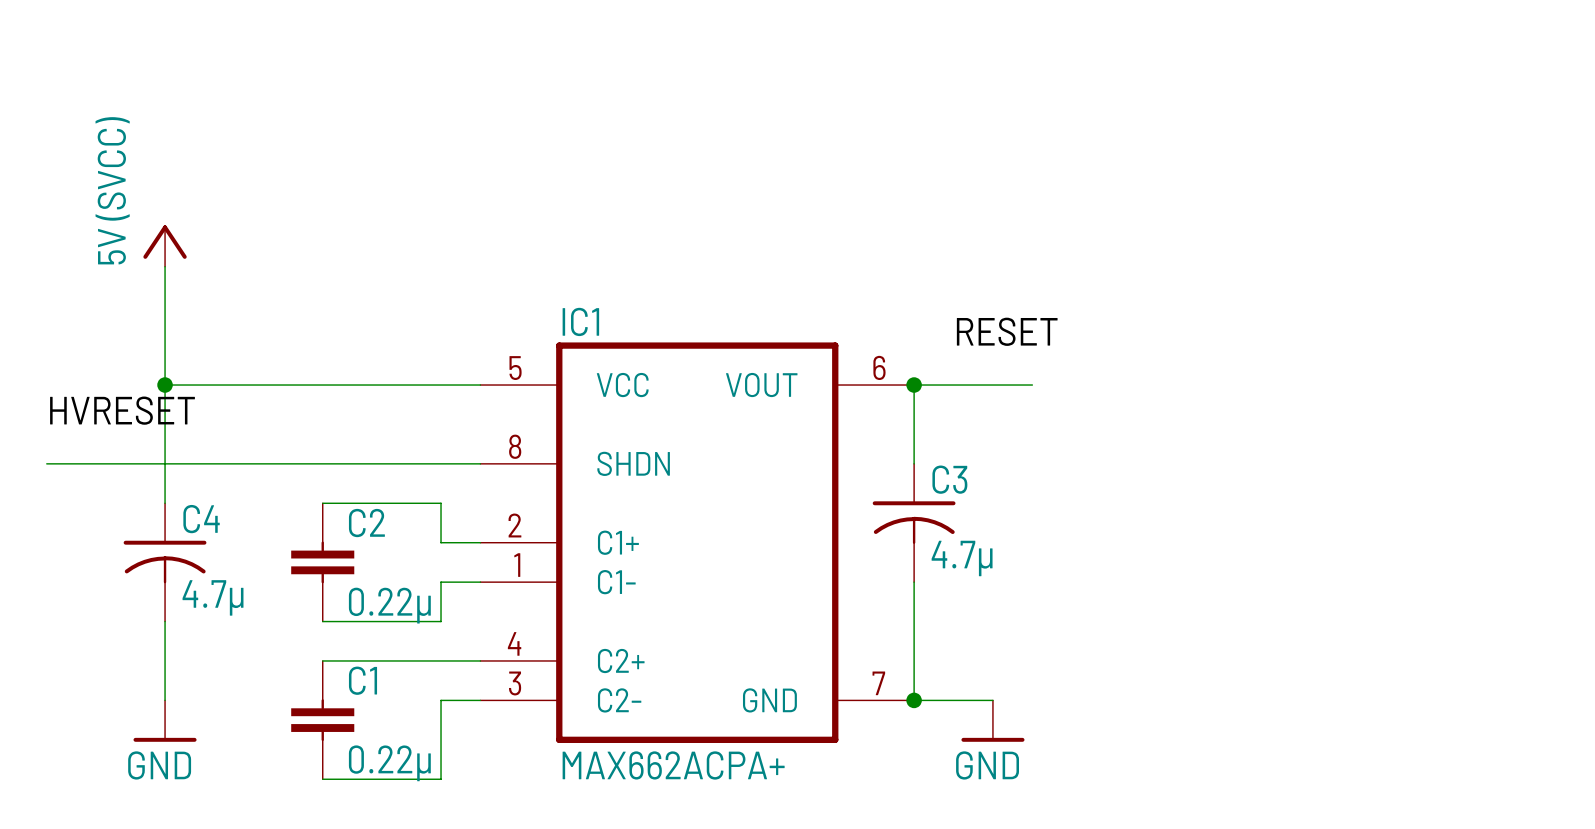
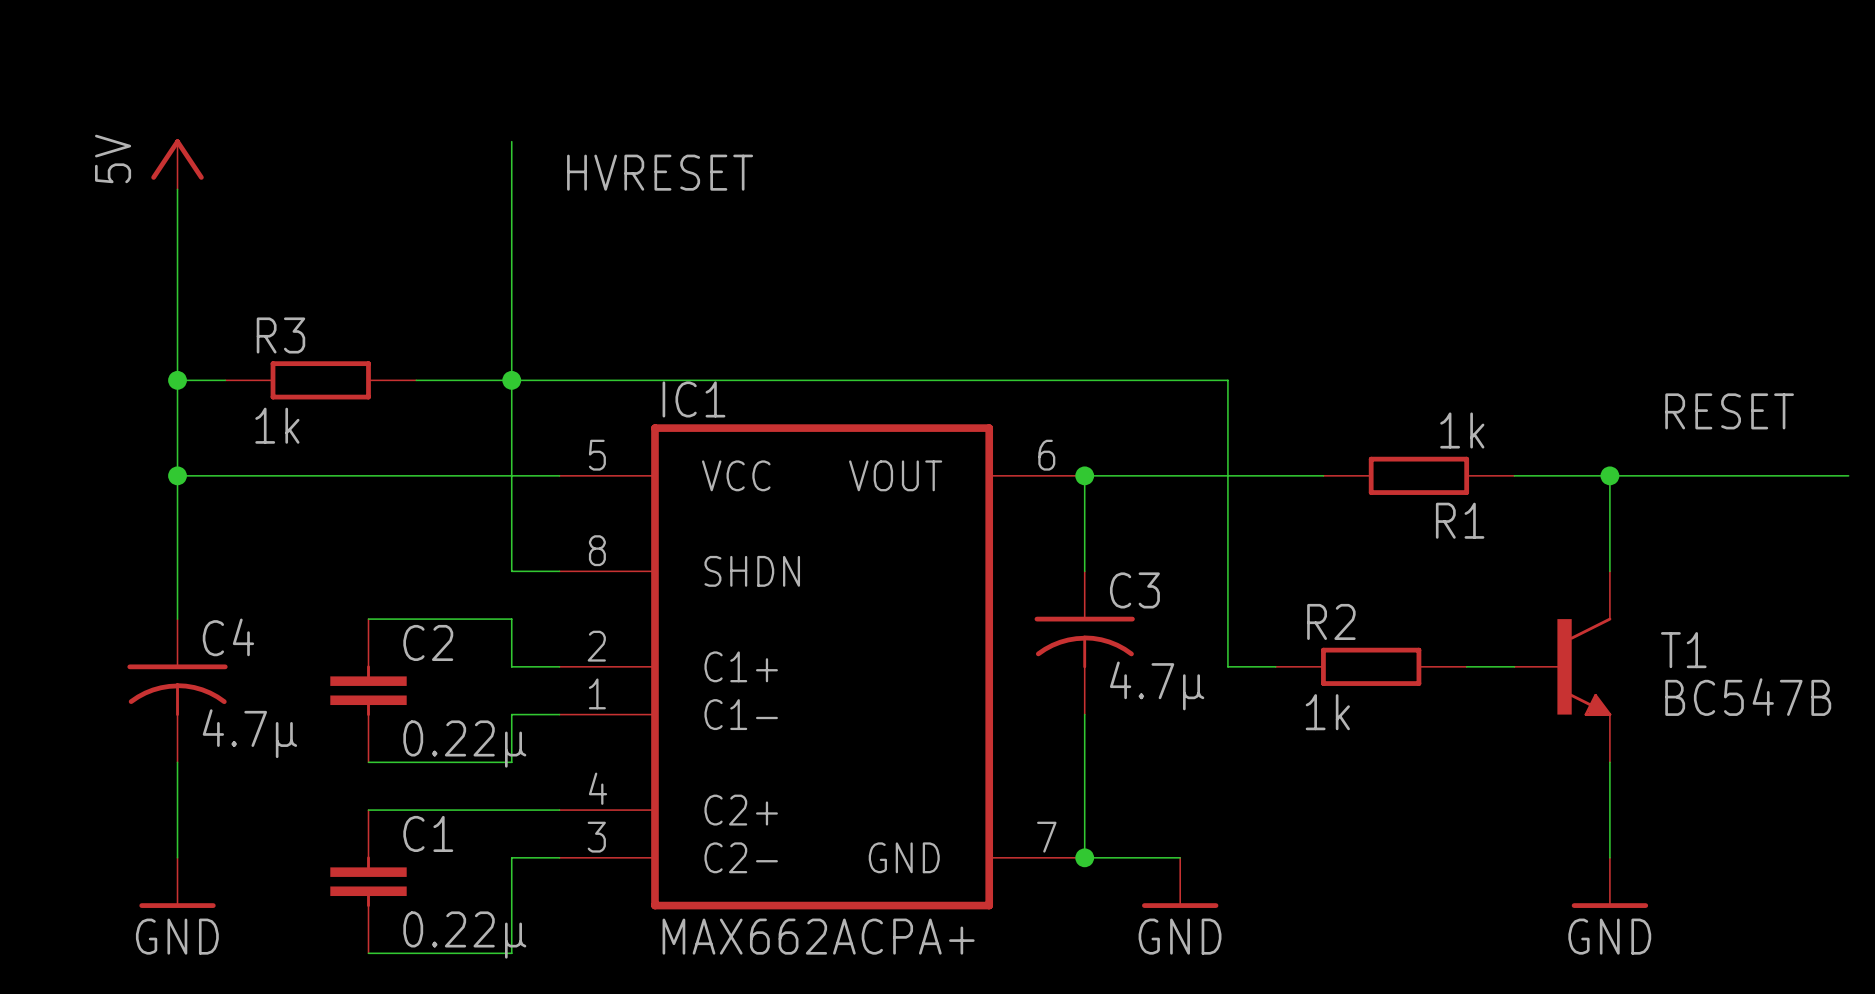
power symbol: none -> 5V (177, 164)
label: none -> HVRESET (660, 172)
wire: none -> (177, 189) (177, 332)
power symbol: 5V (SVCC) (165, 246) -> none
wire: none -> (177, 380) (225, 380)
junction: none -> (177, 380)
R3: none -> 1k (320, 380)
wire: none -> (416, 380) (1227, 380) (1227, 666) (1275, 666)
junction: none -> (511, 380)
label: RESET (1007, 331) -> none
label: none -> RESET (1729, 411)
wire: none -> (1227, 475) (1323, 475)
R1: none -> 1k (1418, 475)
wire: none -> (1514, 475) (1848, 475)
wire: none -> (1609, 475) (1609, 571)
junction: none -> (1609, 475)
label: HVRESET (122, 410) -> none
wire: (46, 463) (441, 463) -> (511, 141) (511, 571)
R2: none -> 1k (1371, 666)
wire: none -> (1466, 666) (1514, 666)
T1: none -> BC547B (1562, 666)
wire: none -> (1609, 762) (1609, 857)
power symbol: none -> GND (1609, 882)

